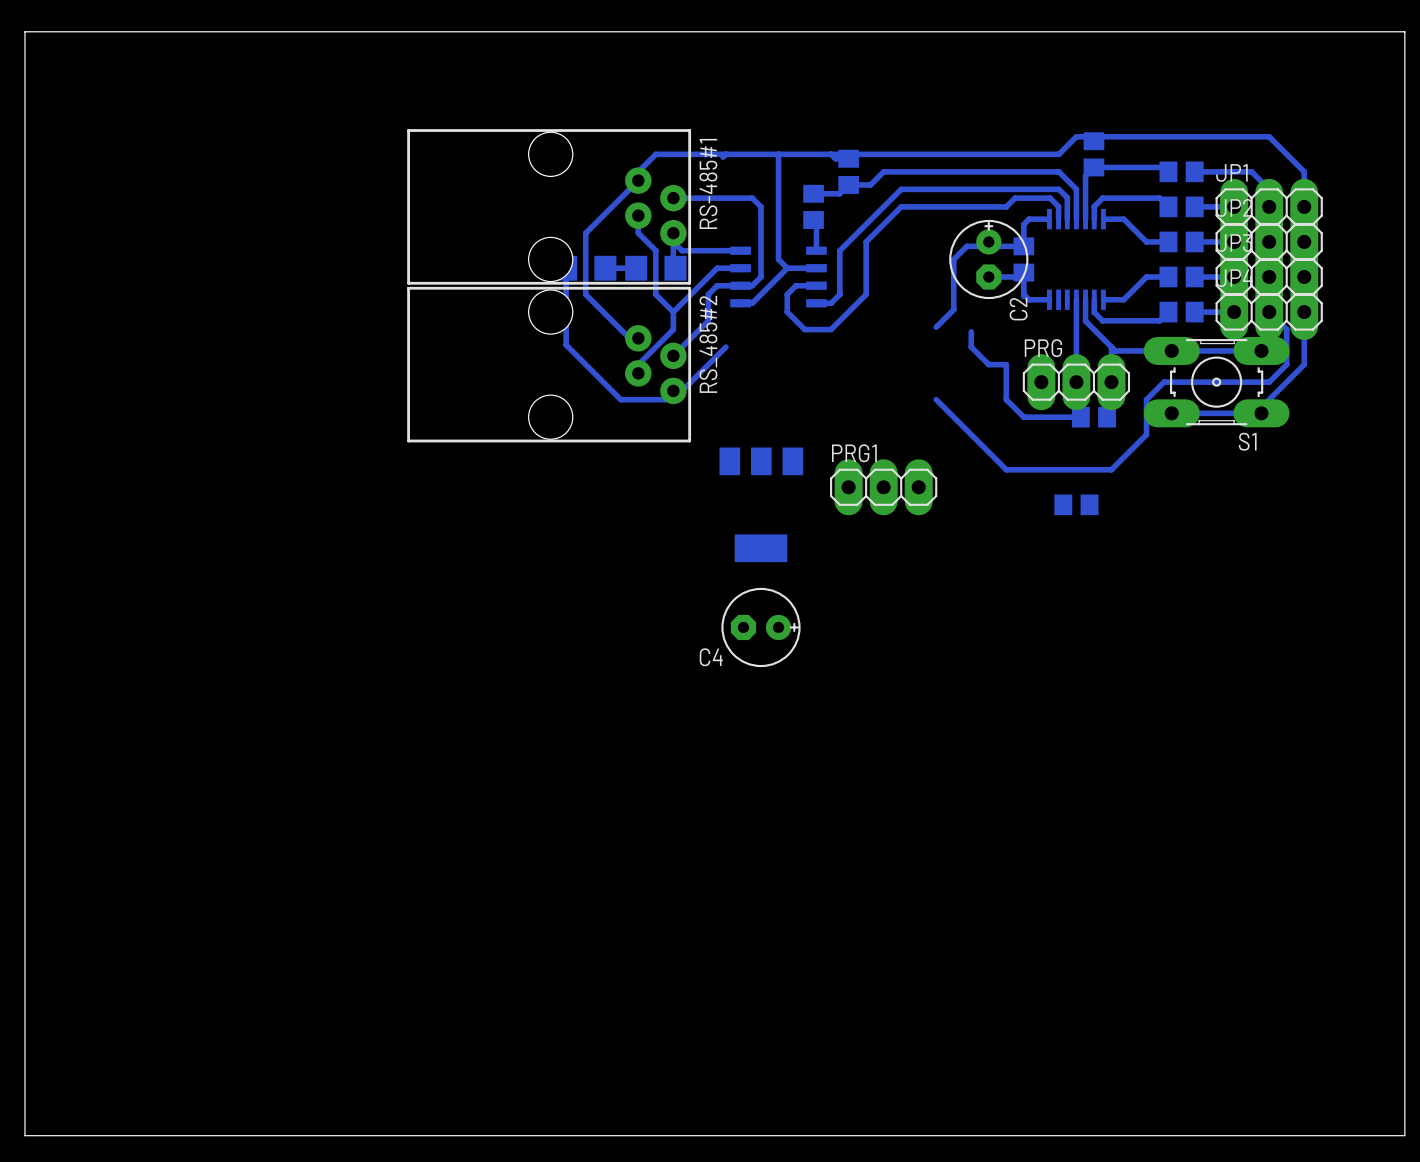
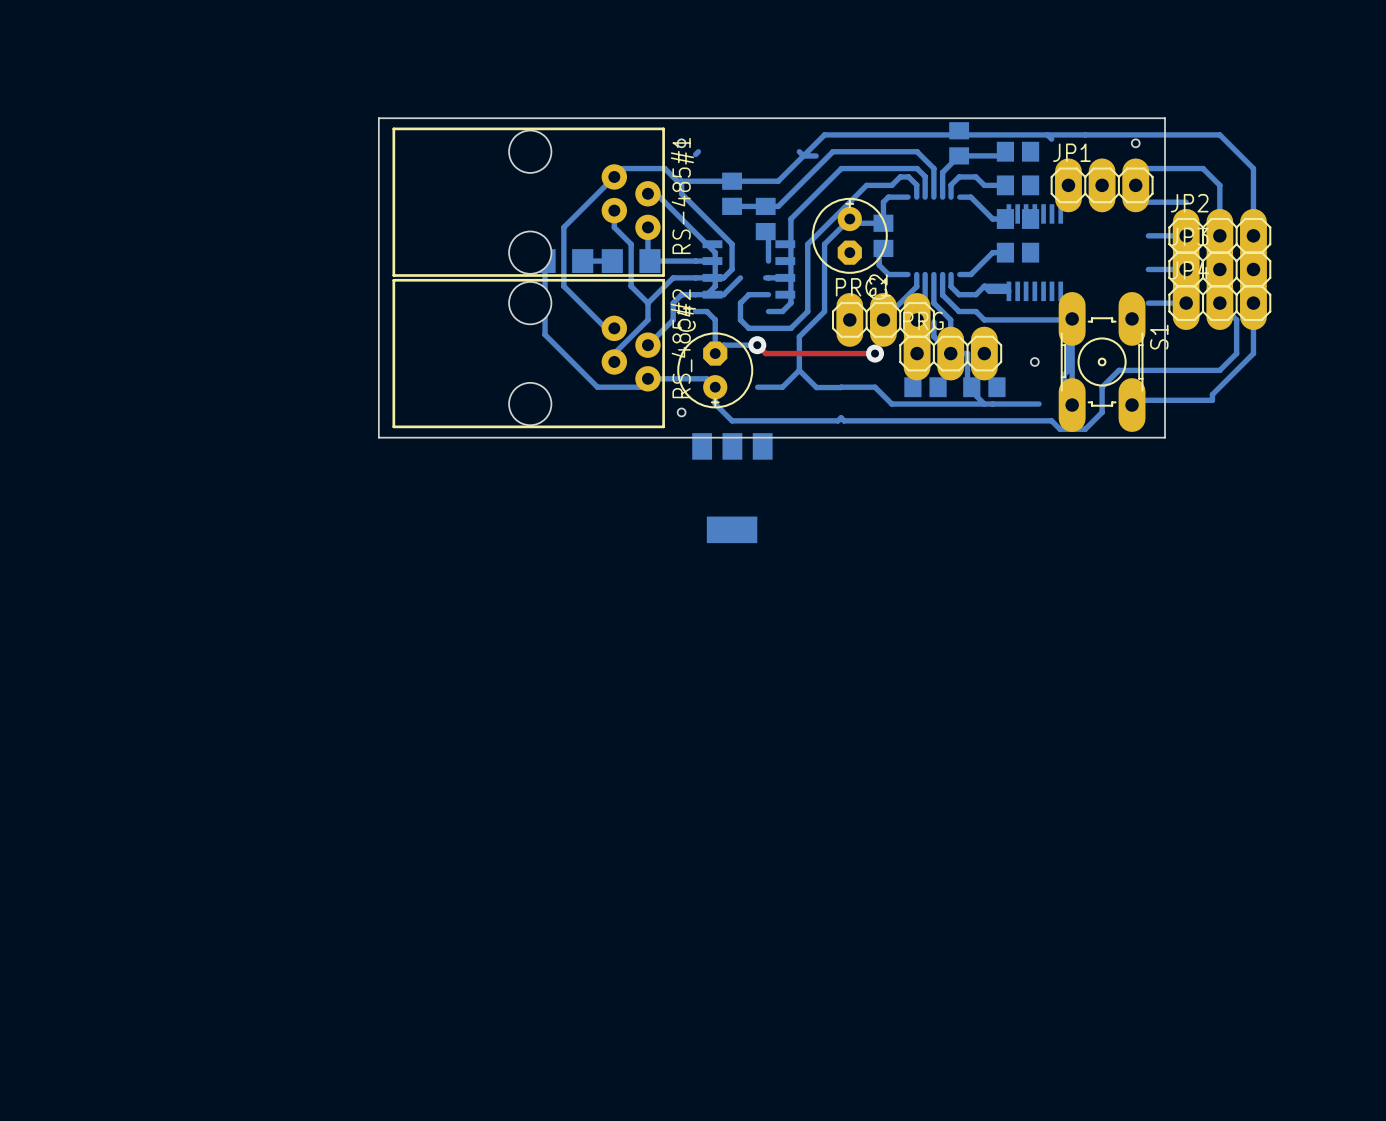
board edge: (24, 31) (1404, 31) (1404, 1135) (24, 1135) (24, 31) -> none
board edge: none -> (378, 118) (1165, 118) (1165, 437) (378, 437) (378, 118)
bottom track: (1076, 136) (1058, 154) (953, 154) -> (933, 197) (933, 168) (917, 151)
bottom track: none -> (1034, 134) (963, 134) (959, 130) (954, 134) (824, 134) (778, 181) (677, 181) (664, 168) (622, 168) (614, 176)
hole: none -> (681, 143)
part: none -> (959, 143)
hole: none -> (1135, 143)
bottom track: (778, 154) (778, 259) (787, 268) -> none
bottom track: (866, 154) (655, 154) (638, 171) (638, 180) -> (832, 151) (778, 206) (732, 206)
bottom track: none -> (1005, 151) (1001, 155) (959, 155) (942, 172) (942, 197)
part: none -> (1018, 151)
part: (1093, 154) -> none
part: (848, 171) -> none
bottom track: (883, 171) (870, 184) (848, 184) (839, 193) (813, 193) -> (849, 168) (841, 168) (790, 219) (790, 303) (782, 311) (768, 311)
bottom track: (953, 171) (1058, 171) (1076, 189) (1076, 219) -> (917, 168) (925, 176) (925, 197)
bottom track: (1168, 171) (1164, 167) (1093, 167) (1085, 175) (1085, 219) -> none
part: (1181, 171) -> none
bottom track: (927, 189) (1023, 189) -> (951, 197) (951, 185) (959, 176) (975, 176) (984, 185)
bottom track: none -> (891, 185) (900, 176) (908, 176) (916, 185) (916, 197)
bottom track: (1045, 189) (1058, 189) (1067, 197) (1067, 219) -> none
part: none -> (1018, 185)
bottom track: (682, 198) (752, 198) (760, 206) (760, 250) -> (681, 181) (681, 193) (732, 244)
part: none -> (732, 193)
bottom track: none -> (959, 197) (970, 197) (992, 219) (1005, 219)
part position: (813, 206) -> (765, 219)
bottom track: (1168, 206) (1159, 198) (1102, 198) (1094, 206) (1094, 219) -> none
part: (1181, 206) -> none
JP1 position: (1269, 206) -> (1102, 185)
bottom track: (1049, 219) (1029, 219) (1023, 224) (1023, 246) (966, 246) (953, 259) (953, 309) (936, 327) -> none
bottom track: (1058, 219) (1058, 206) (1050, 198) (1015, 198) (1006, 206) (901, 206) (883, 224) -> (908, 197) (888, 197) (883, 202) (883, 223) (854, 223) (849, 219)
bottom track: (1103, 219) (1123, 219) (1146, 241) (1168, 241) -> none
bottom track: (813, 220) (816, 222) (816, 250) -> (765, 231) (768, 234) (768, 261)
part: none -> (1018, 219)
bottom track: (673, 241) (682, 250) (740, 250) -> none
bottom track: (866, 241) (866, 294) (839, 320) -> (832, 235) (824, 244) (824, 311) (799, 336) (799, 370)
part: none -> (883, 235)
part: (1181, 241) -> none
bottom track: none -> (883, 248) (879, 252) (879, 265) (888, 274) (908, 274)
C2 position: (988, 259) -> (849, 235)
part: (1023, 259) -> none
bottom track: none -> (1005, 252) (992, 252) (970, 274) (959, 274)
part: none -> (1018, 252)
bottom track: none -> (649, 261) (690, 261)
bottom track: (717, 268) (699, 285) -> (690, 277) (673, 277)
bottom track: (787, 268) (816, 268) -> none
bottom track: (787, 268) (769, 285) -> none
bottom track: (988, 276) (1019, 276) (1023, 272) (1023, 296) -> none
bottom track: (1168, 276) (1146, 276) (1123, 299) (1103, 299) -> none
part: (1181, 276) -> none
bottom track: none -> (916, 274) (916, 286) (883, 319)
bottom track: none -> (925, 274) (925, 311) (917, 319)
bottom track: none -> (933, 274) (933, 303) (950, 319) (950, 353)
bottom track: none -> (942, 274) (942, 295) (959, 311) (975, 311) (984, 319) (1072, 318) (1072, 405)
bottom track: none -> (951, 274) (951, 286) (959, 294) (975, 294) (984, 286) (1005, 286)
bottom track: (717, 285) (708, 294) (708, 320) (699, 329) -> (656, 193) (715, 252) (715, 286) (706, 294) (681, 294) (673, 303) (673, 319)
bottom track: (796, 285) (787, 294) (787, 312) (804, 329) (831, 329) -> (768, 294) (748, 294) (740, 303) (740, 319) (748, 328) (790, 328) (799, 319)
bottom track: (839, 294) (831, 303) (816, 303) -> (807, 286) (807, 311)
bottom track: (1076, 299) (1076, 382) -> none
bottom track: (1085, 299) (1085, 321) (1115, 350) (1261, 350) -> none
bottom track: (1094, 299) (1094, 312) (1102, 320) (1159, 320) (1168, 312) -> none
part: (1181, 312) -> none
bottom track: none -> (695, 311) (706, 311) (715, 319) (715, 353) (723, 345) (757, 345)
bottom track: (725, 347) (682, 390) -> none
top track: none -> (757, 345) (765, 353) (875, 353)
via: none -> (757, 345)
via: none -> (875, 353)
hole: none -> (1034, 361)
bottom track: none -> (799, 370) (816, 387) (875, 387) (891, 404) (984, 404)
bottom track: none -> (799, 370) (782, 387) (757, 387)
PRG position: (1076, 382) -> (950, 353)
S1 rotation: 0° (1216, 382) -> 90° counterclockwise (1102, 361)
bottom track: (936, 399) (1006, 469) (1111, 469) (1146, 434) (1146, 425) -> (656, 378) (706, 378) (715, 387) (715, 404) (732, 420) (838, 420) (841, 417) (844, 420) (1051, 420) (1060, 429) (1085, 429) (1102, 412)
part: none -> (925, 387)
part: none -> (984, 387)
part: (1093, 417) -> none
hole: none -> (681, 412)
PRG1 position: (883, 487) -> (883, 319)
part: (1076, 504) -> none
C4 rotation: 0° (760, 627) -> 90° clockwise (715, 370)
C4 position: (760, 627) -> (715, 370)

